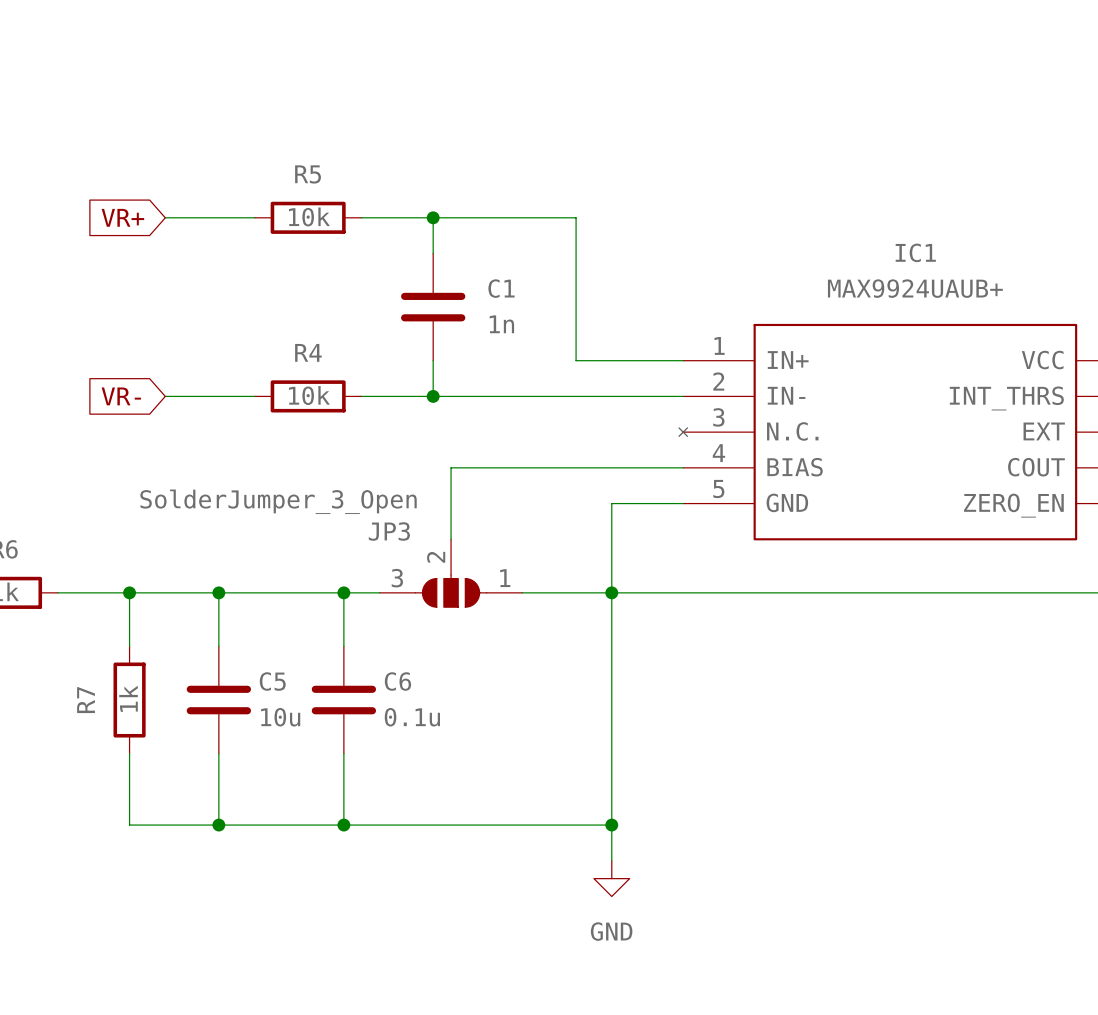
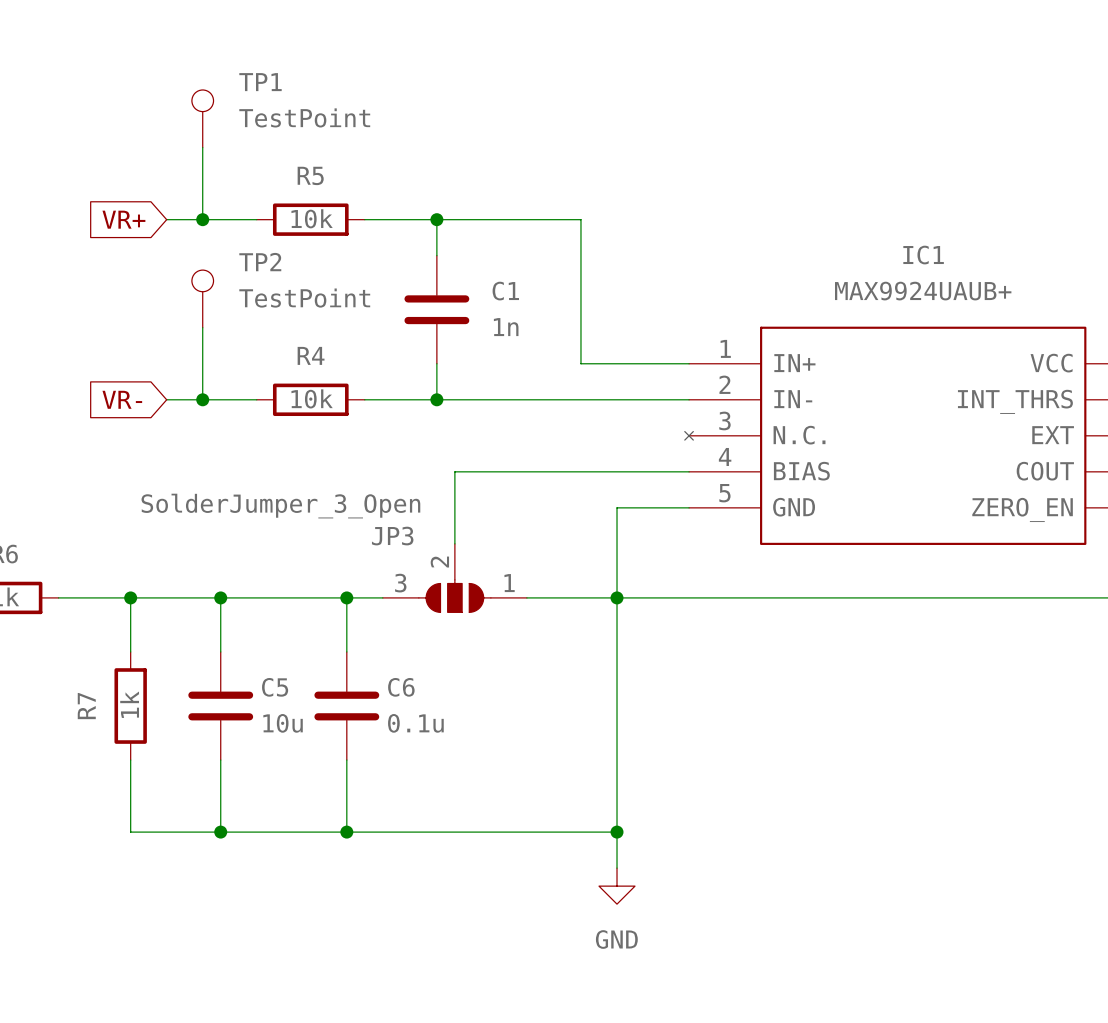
TP1: none -> TestPoint (202, 118)
wire: none -> (202, 147) (202, 219)
junction: none -> (202, 219)
TP2: none -> TestPoint (202, 298)
wire: none -> (202, 327) (202, 399)
junction: none -> (202, 399)

